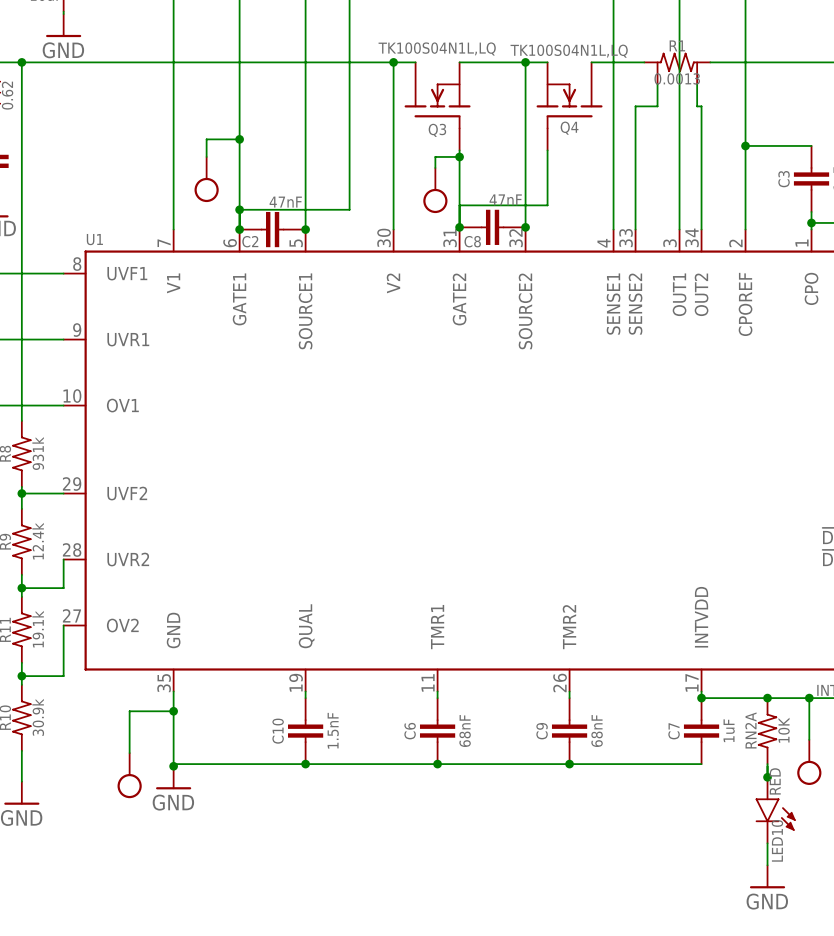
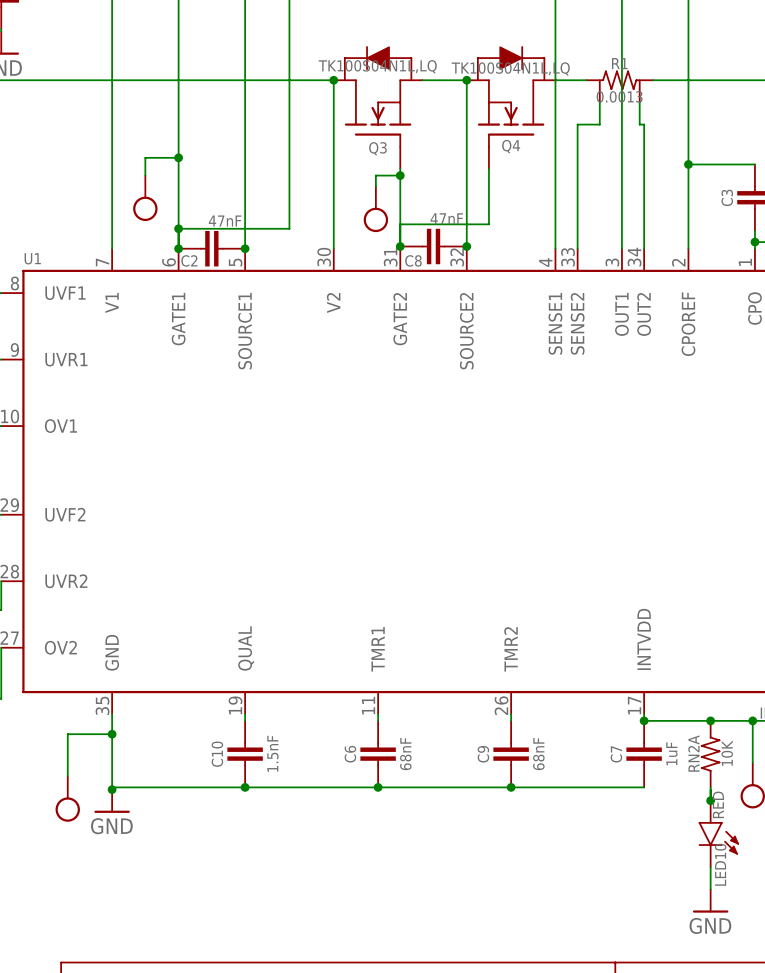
Q3 symbol: [404, 62, 471, 151] -> [333, 46, 423, 169]
Q4 symbol: [536, 62, 603, 151] -> [466, 46, 556, 169]

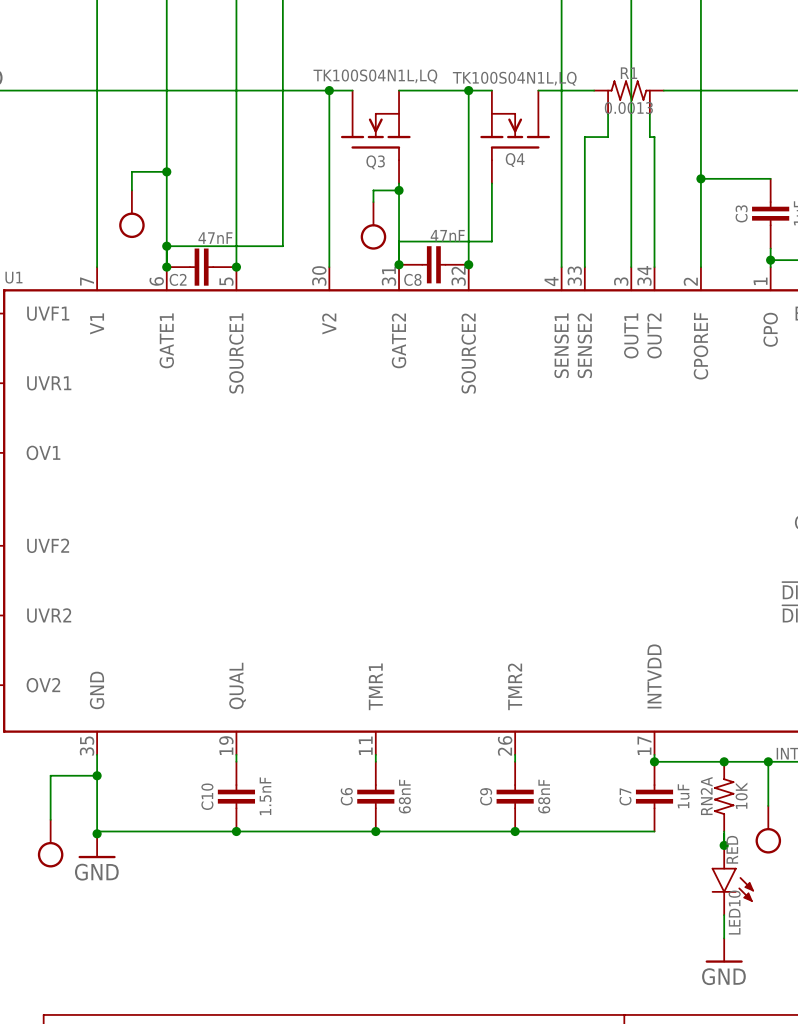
Q3 symbol: [333, 46, 423, 169] -> [340, 90, 411, 184]
Q4 symbol: [466, 46, 556, 169] -> [480, 90, 550, 184]

